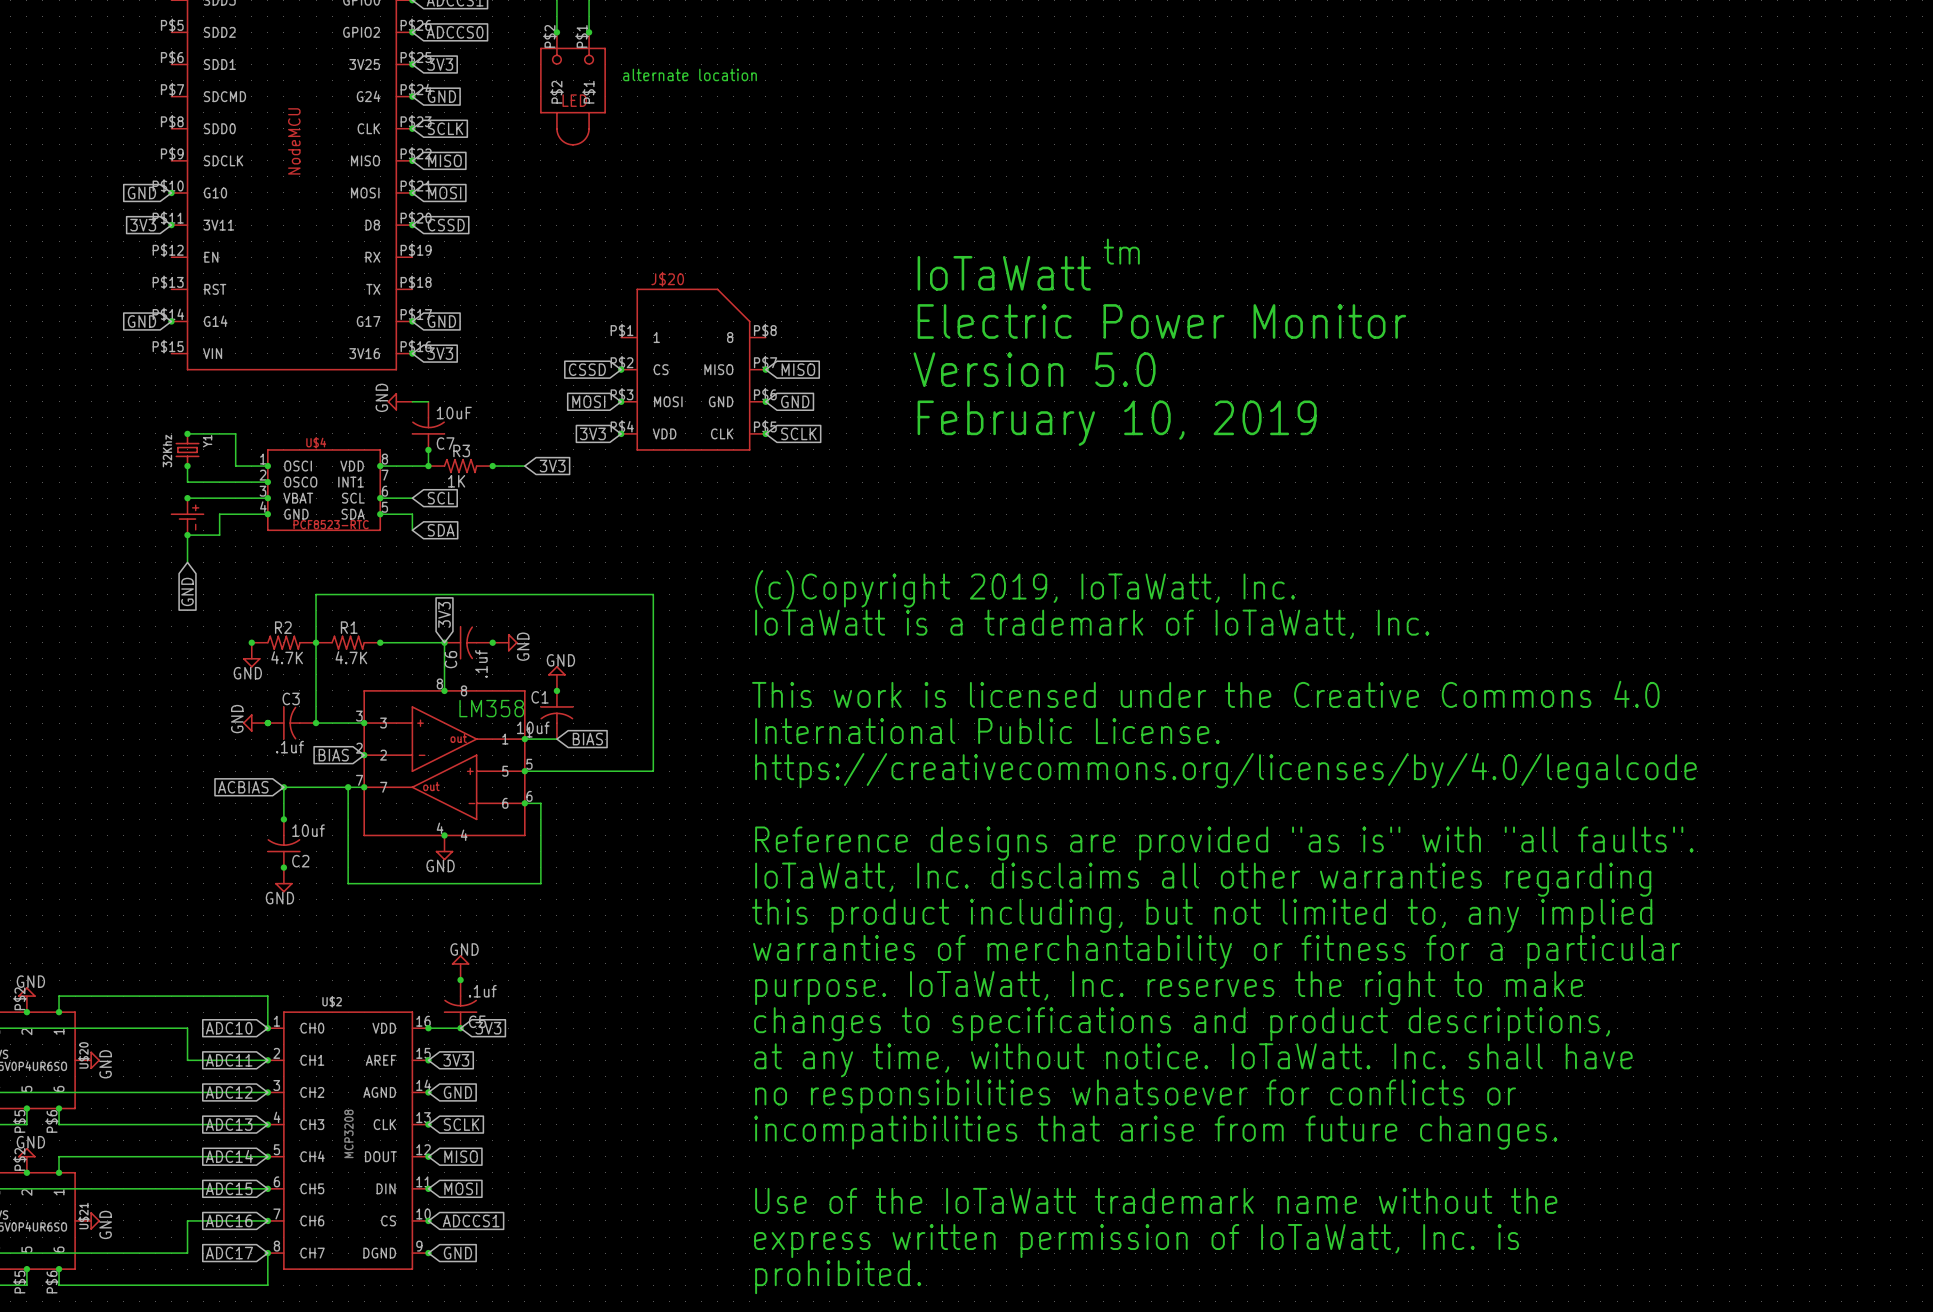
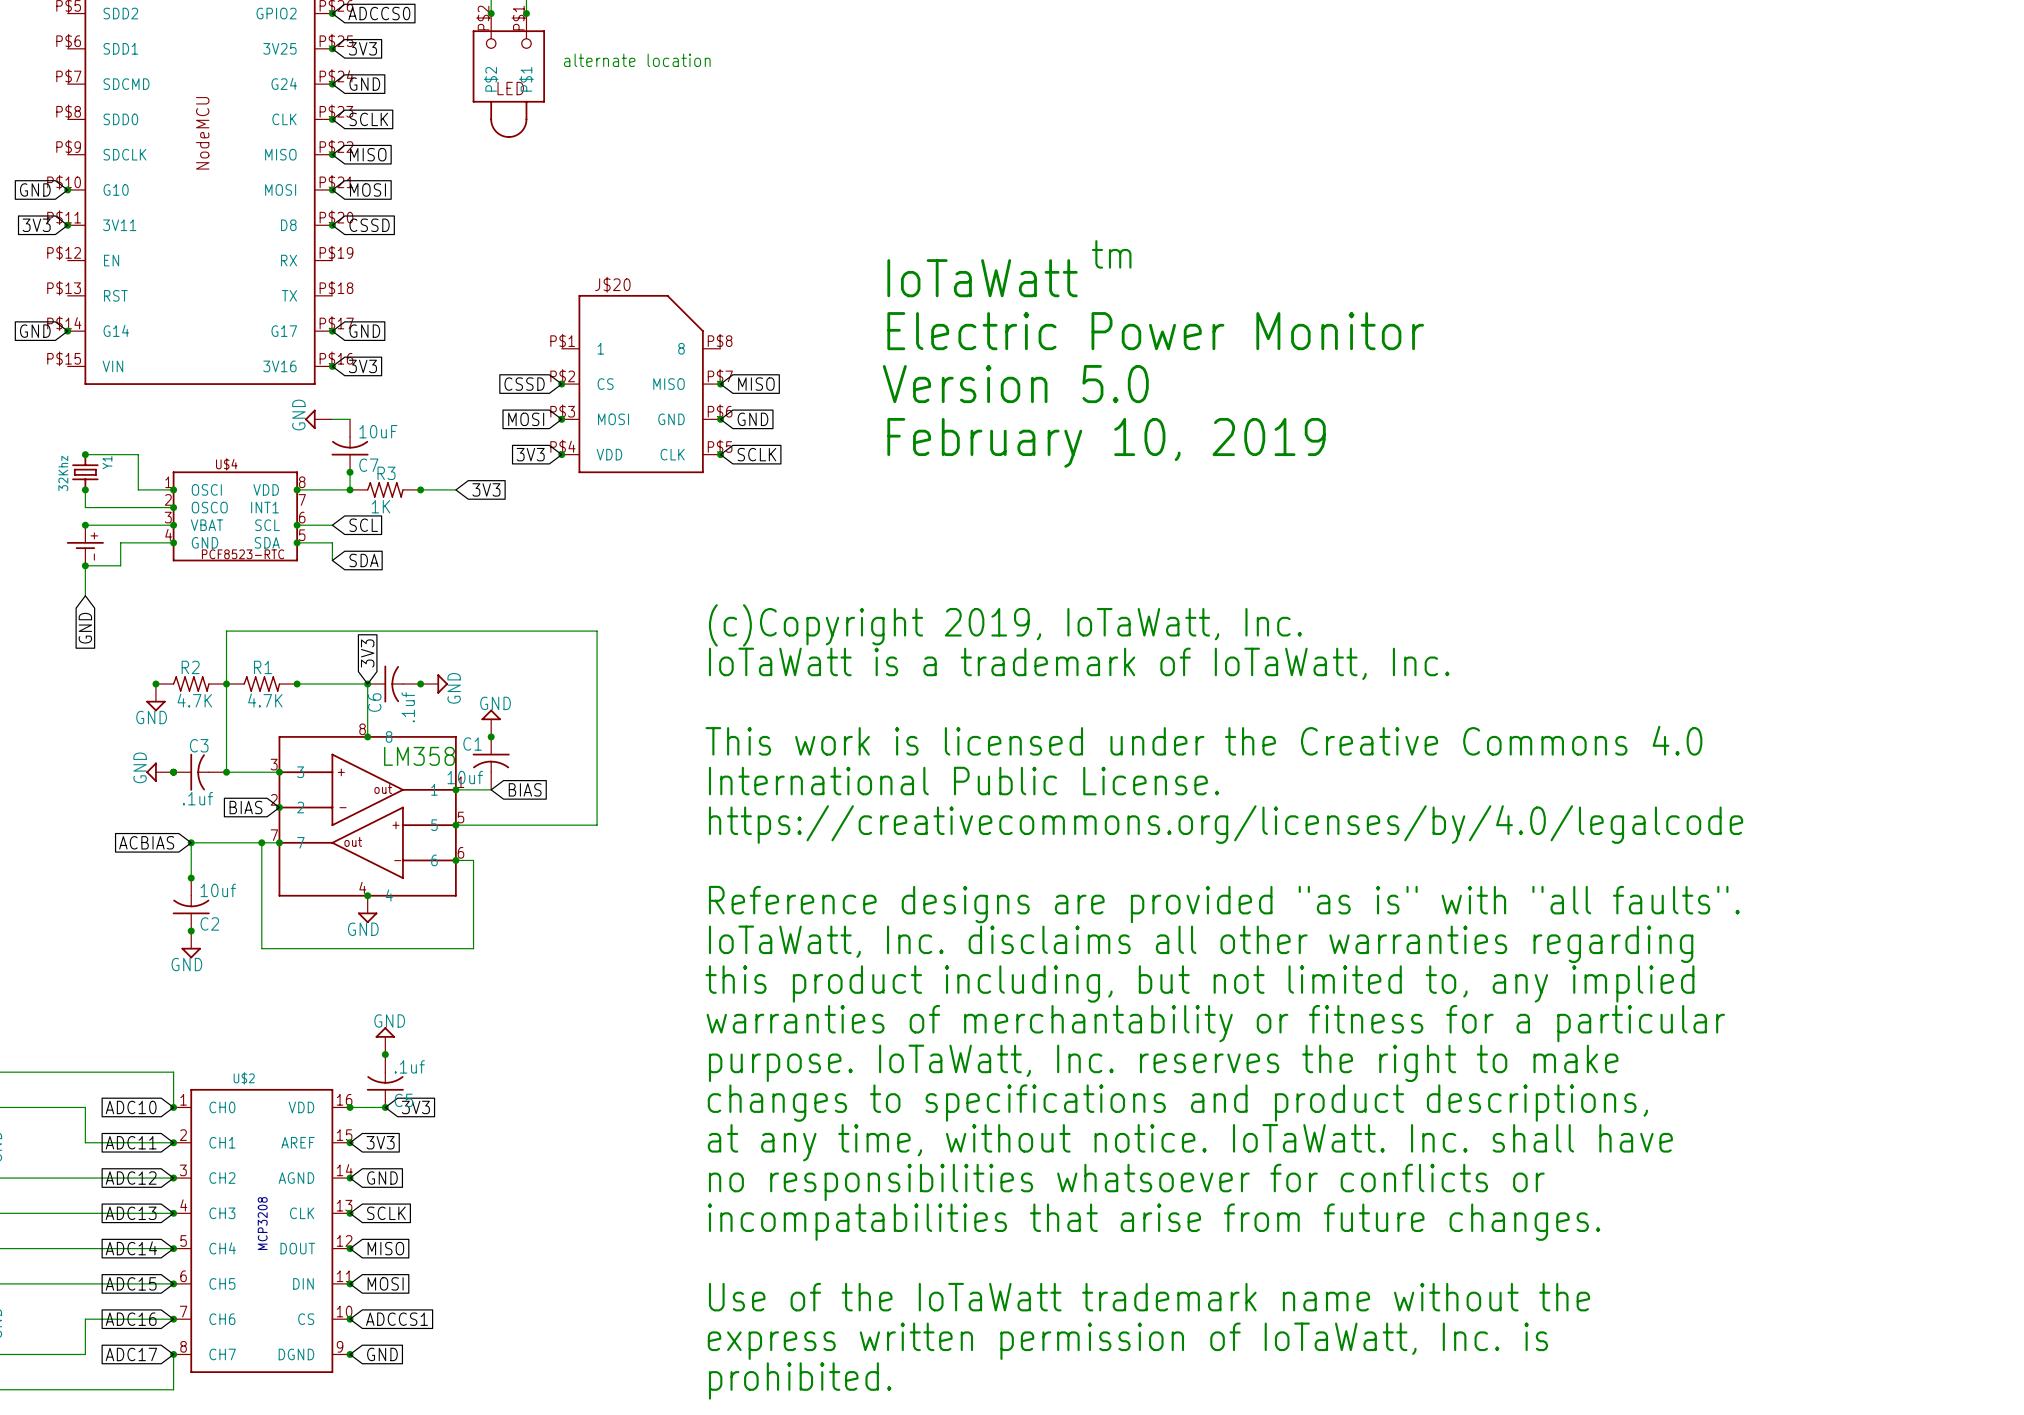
text: incompatibilities that arise from future changes. (1155, 1132) -> incompatabilities that arise from future changes. (1154, 1222)

